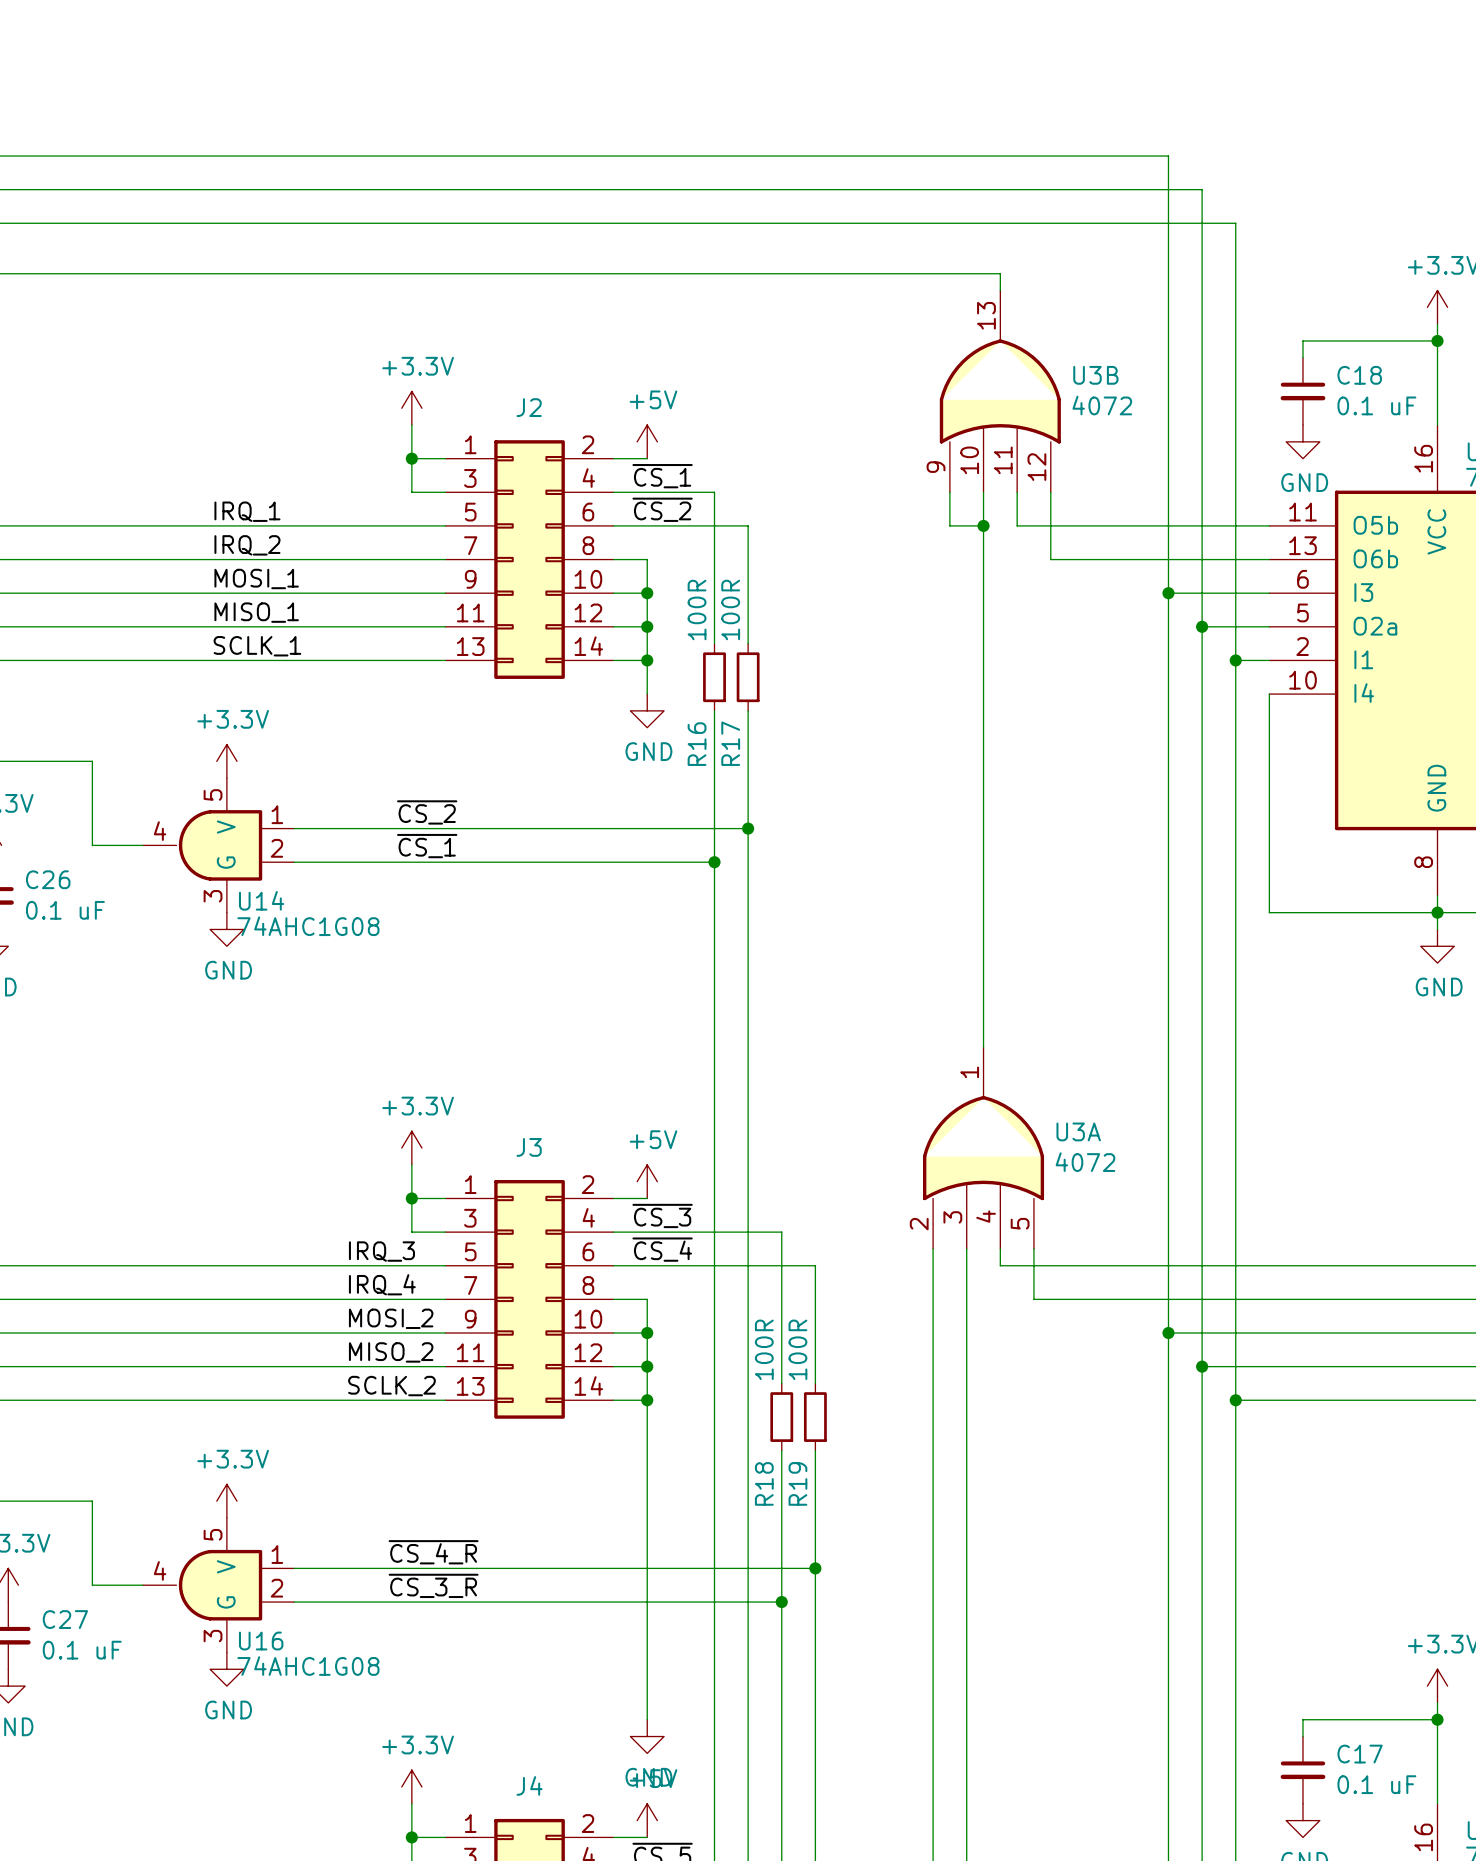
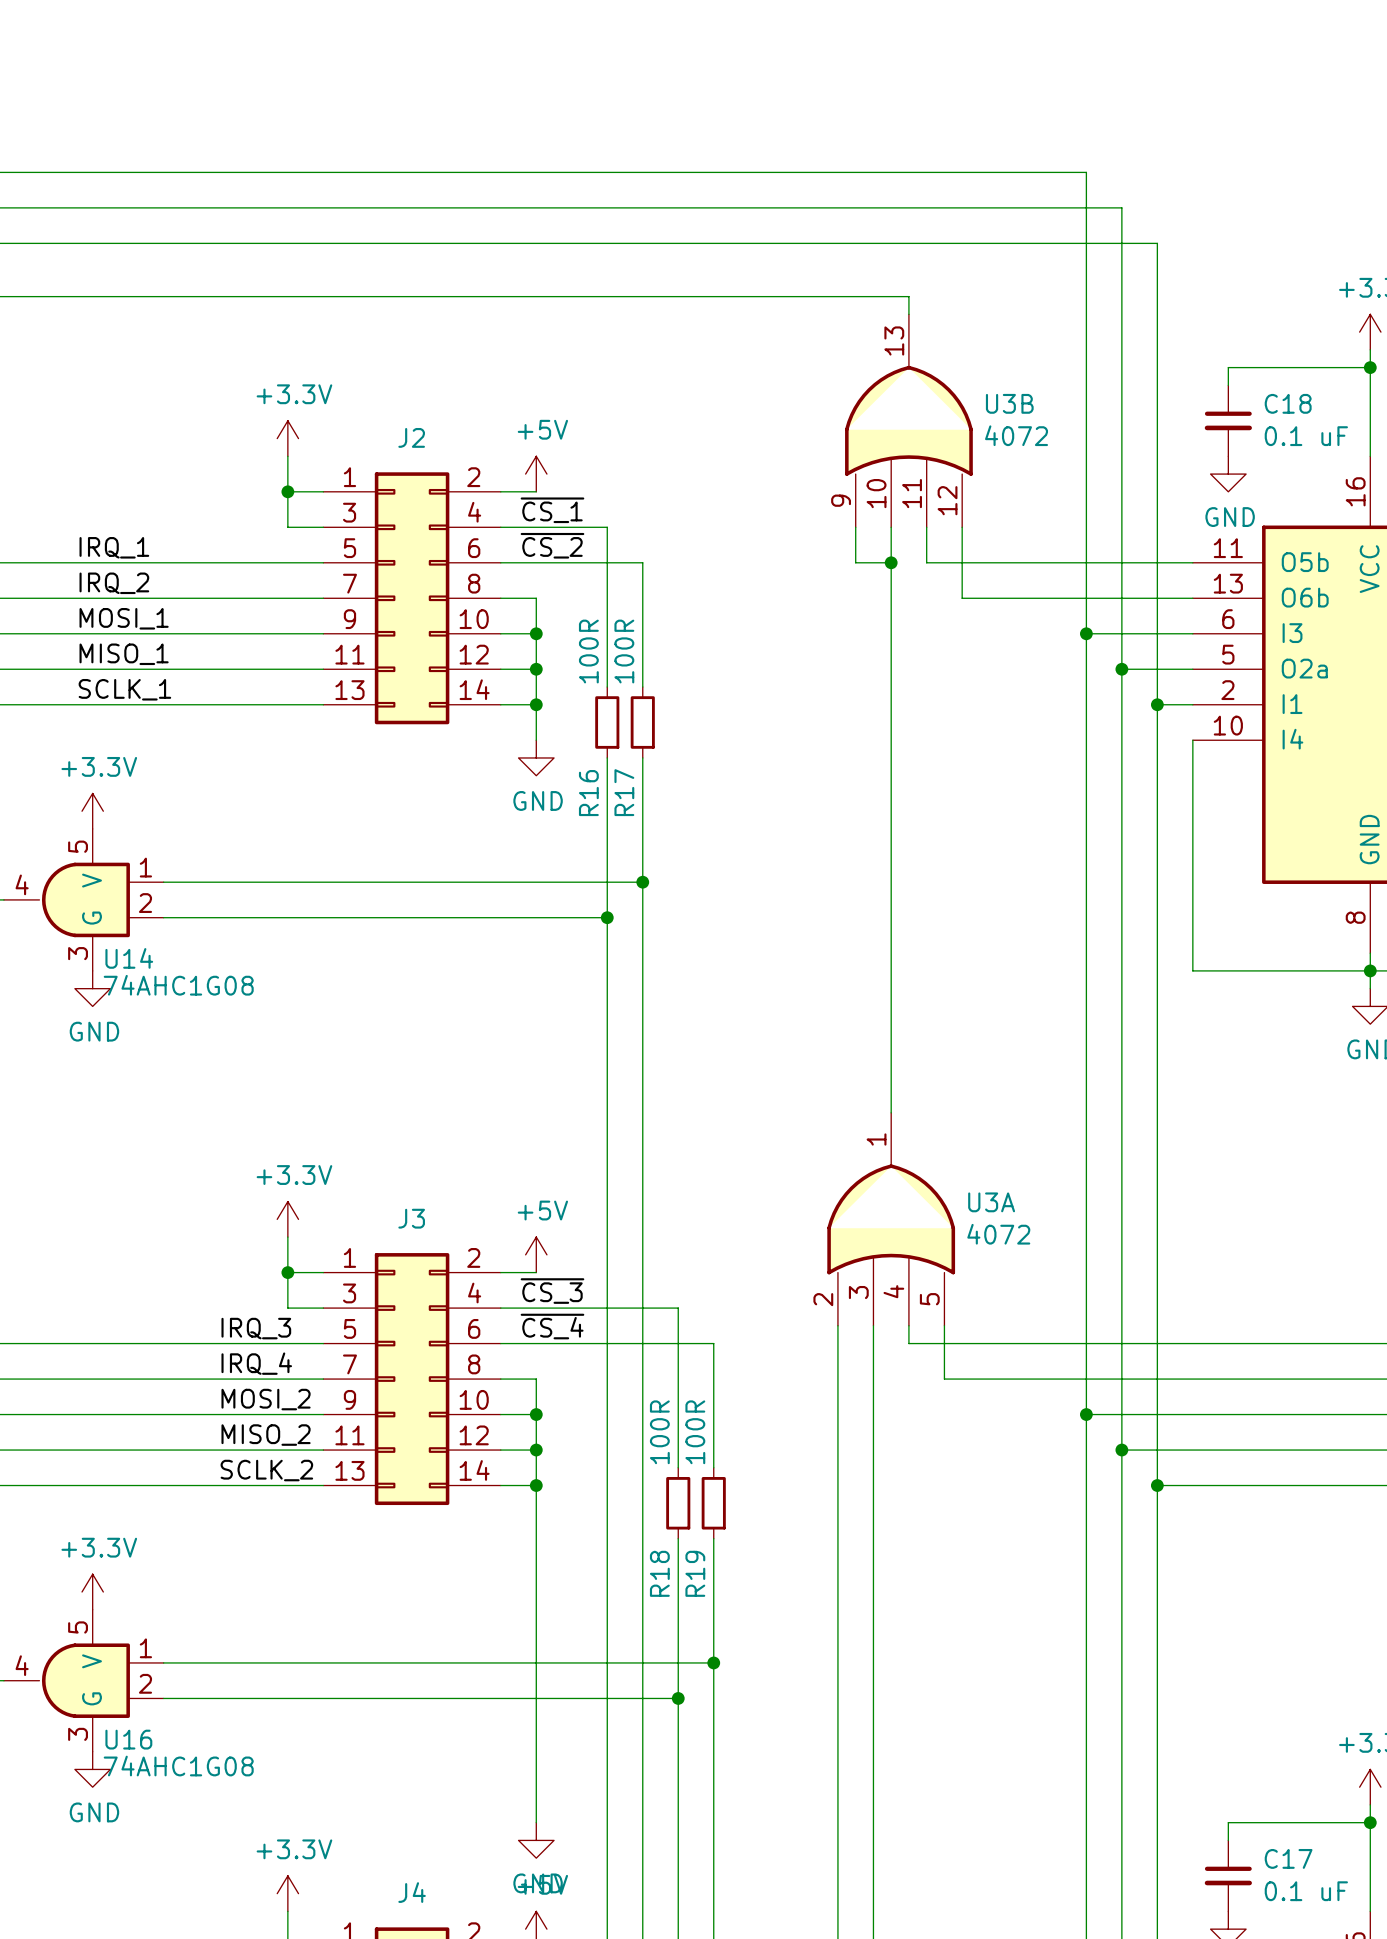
label: ~{CS_2} (427, 812) -> none
label: ~{CS_1} (427, 846) -> none
label: ~{CS_4_R} (433, 1552) -> none
label: ~{CS_3_R} (433, 1585) -> none

